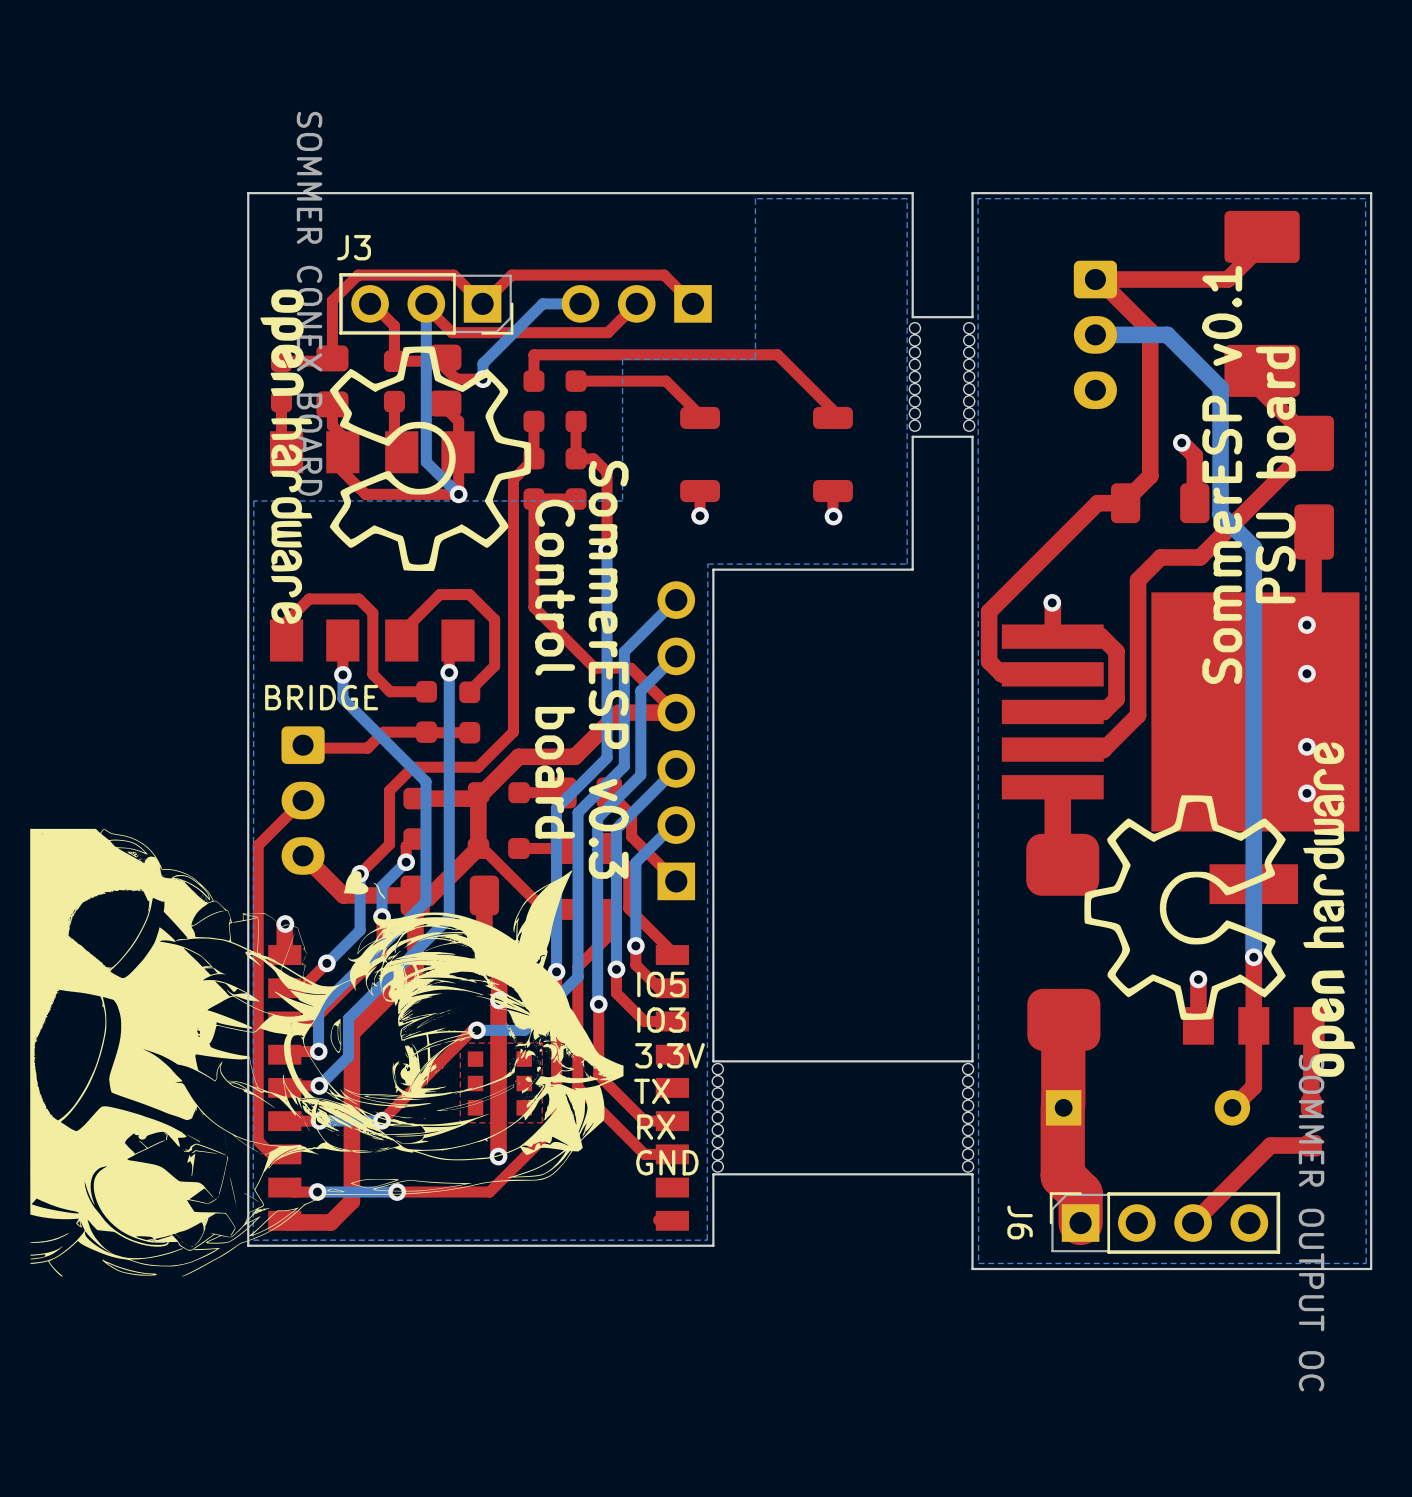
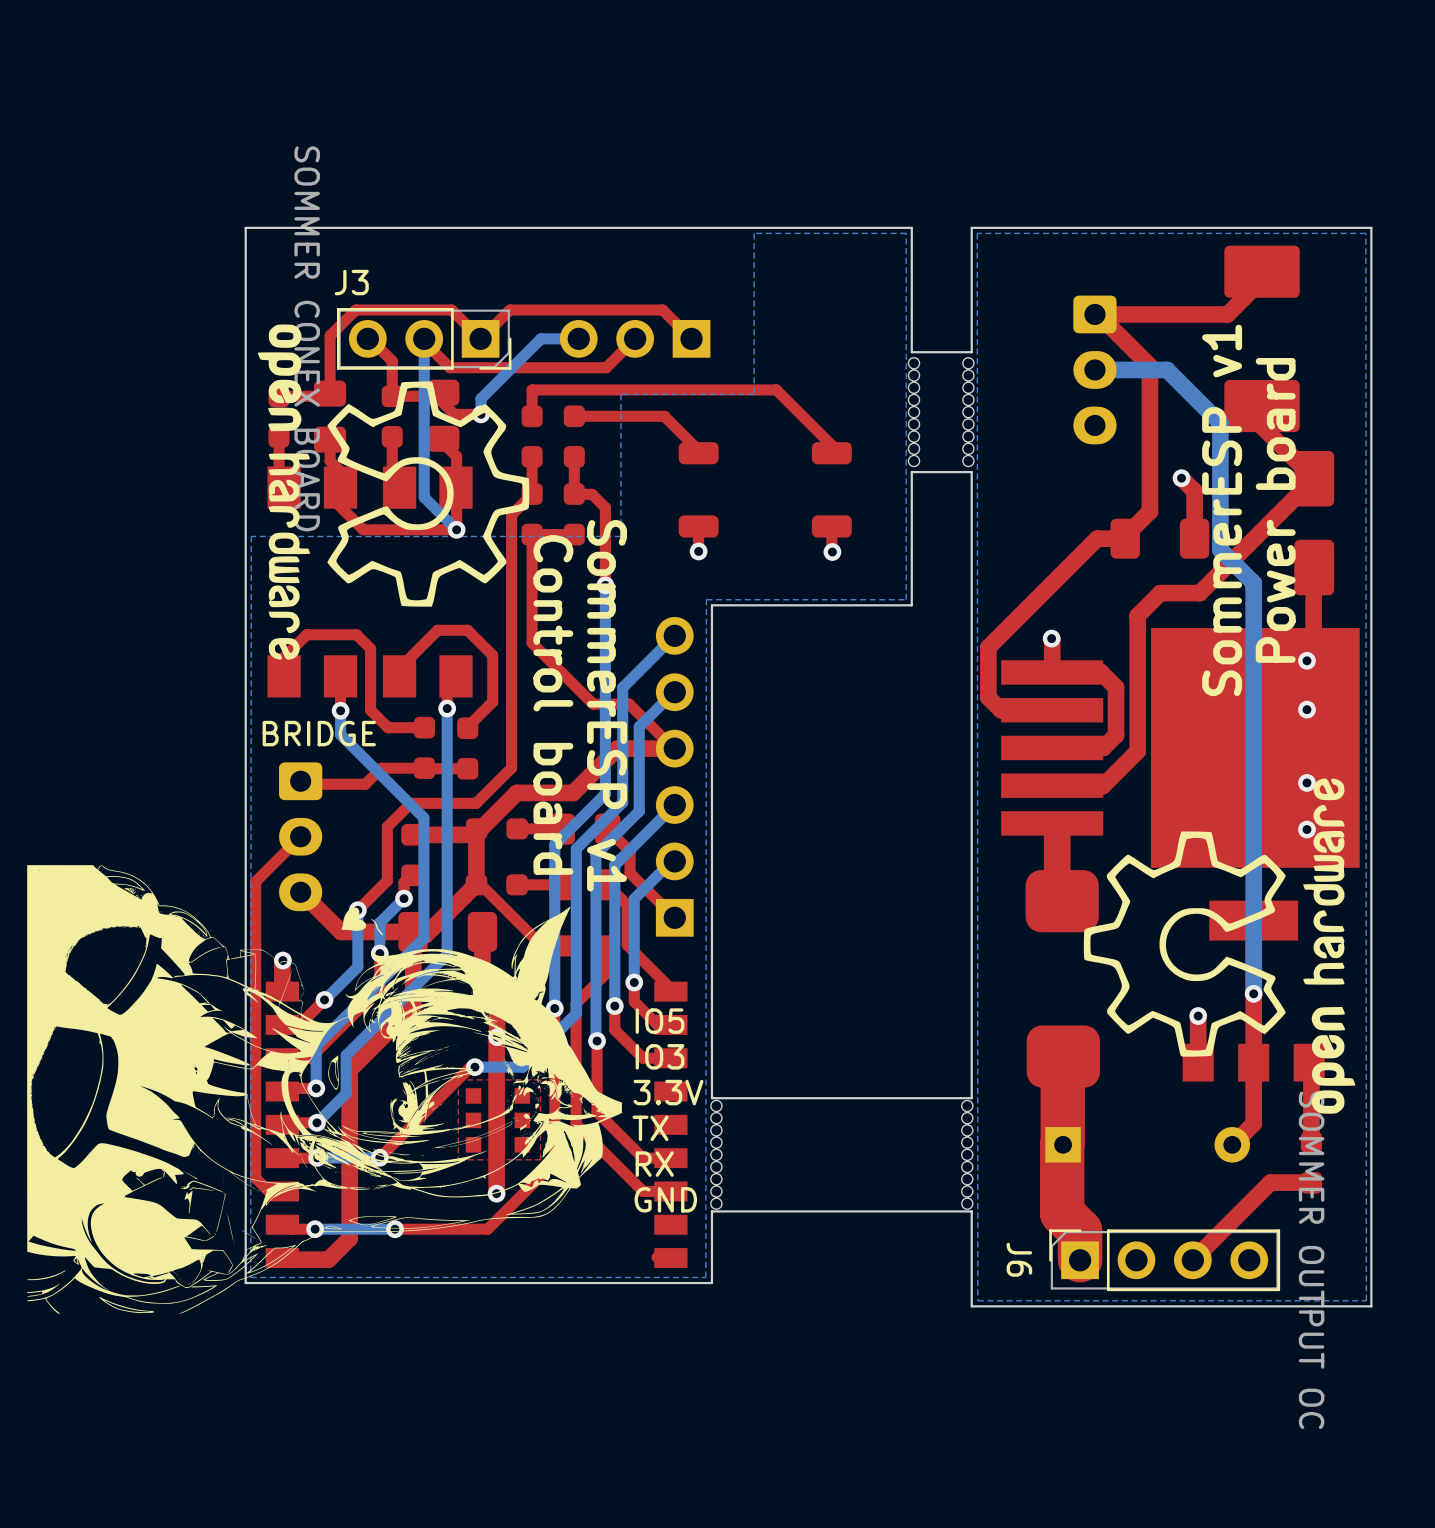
text: SommerESP v0.1 (1222, 474) -> SommerESP v1 (1222, 510)
text: PSU board (1275, 474) -> Power board (1275, 510)
text: SommerESP v0.3 (608, 669) -> SommerESP v1 (607, 705)

